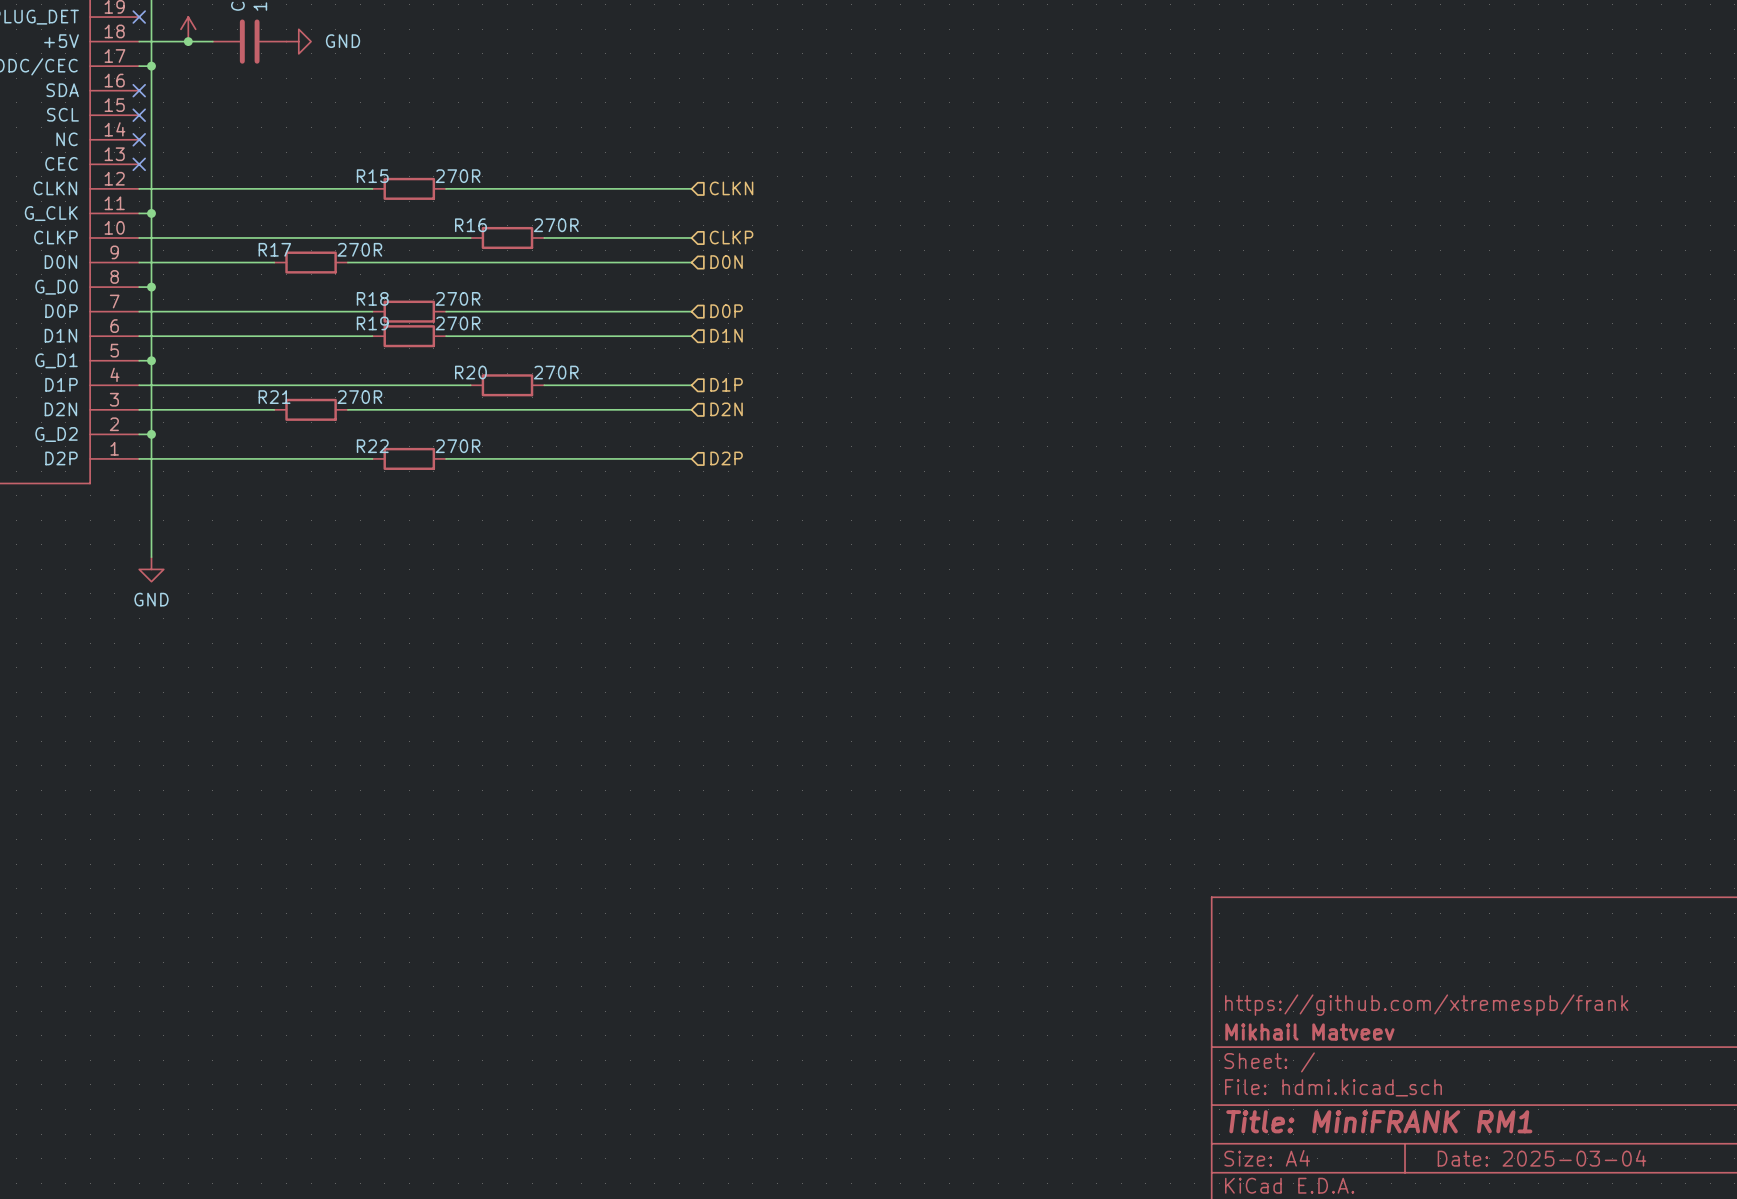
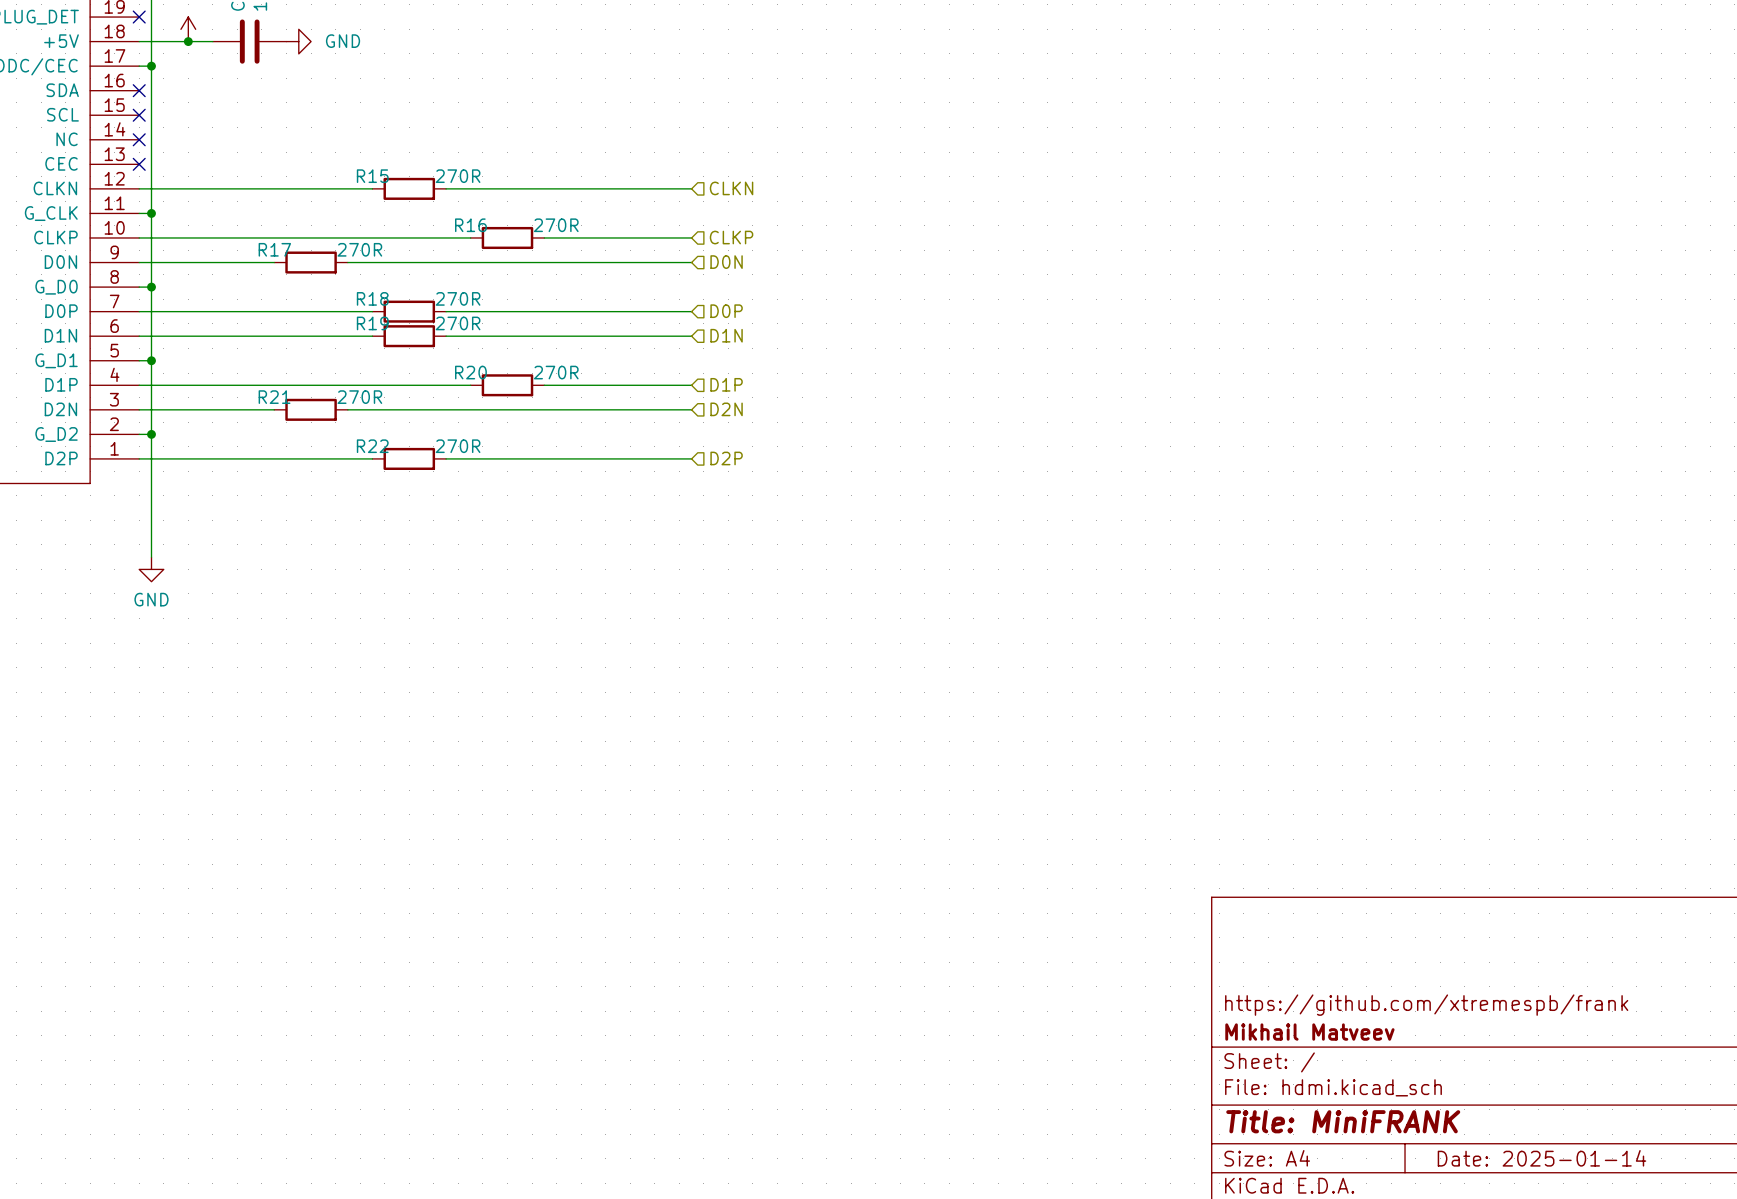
title block: Title: MiniFRANK RM1 (1379, 1121) -> Title: MiniFRANK (1343, 1121)
title block: Date: 2025-03-04 (1541, 1158) -> Date: 2025-01-14 (1541, 1158)

